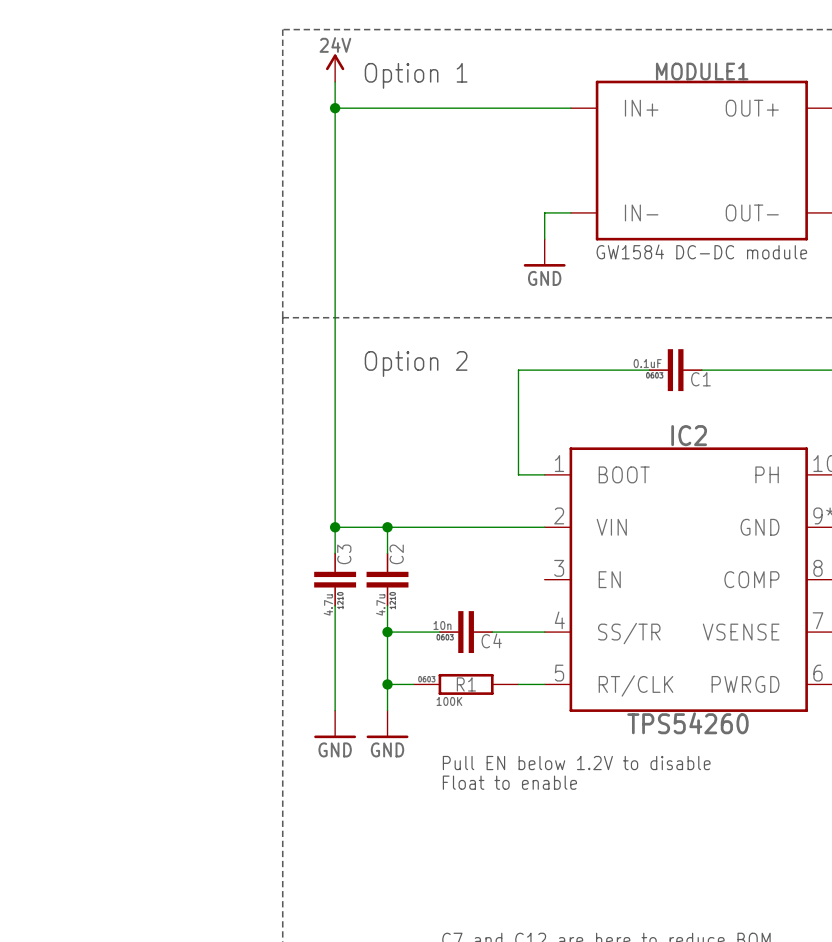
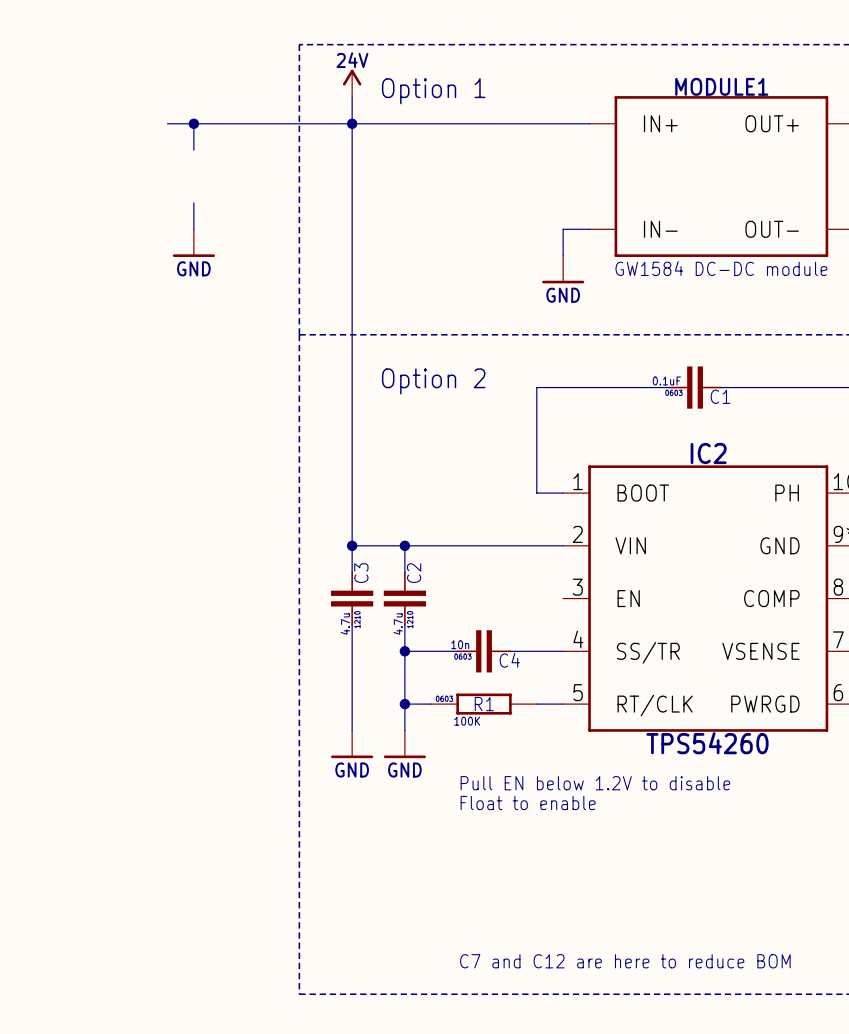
wire: none -> (167, 123) (352, 123)
wire: none -> (193, 123) (193, 150)
junction: none -> (193, 123)
wire: none -> (193, 202) (193, 229)
power symbol: none -> GND (193, 243)

